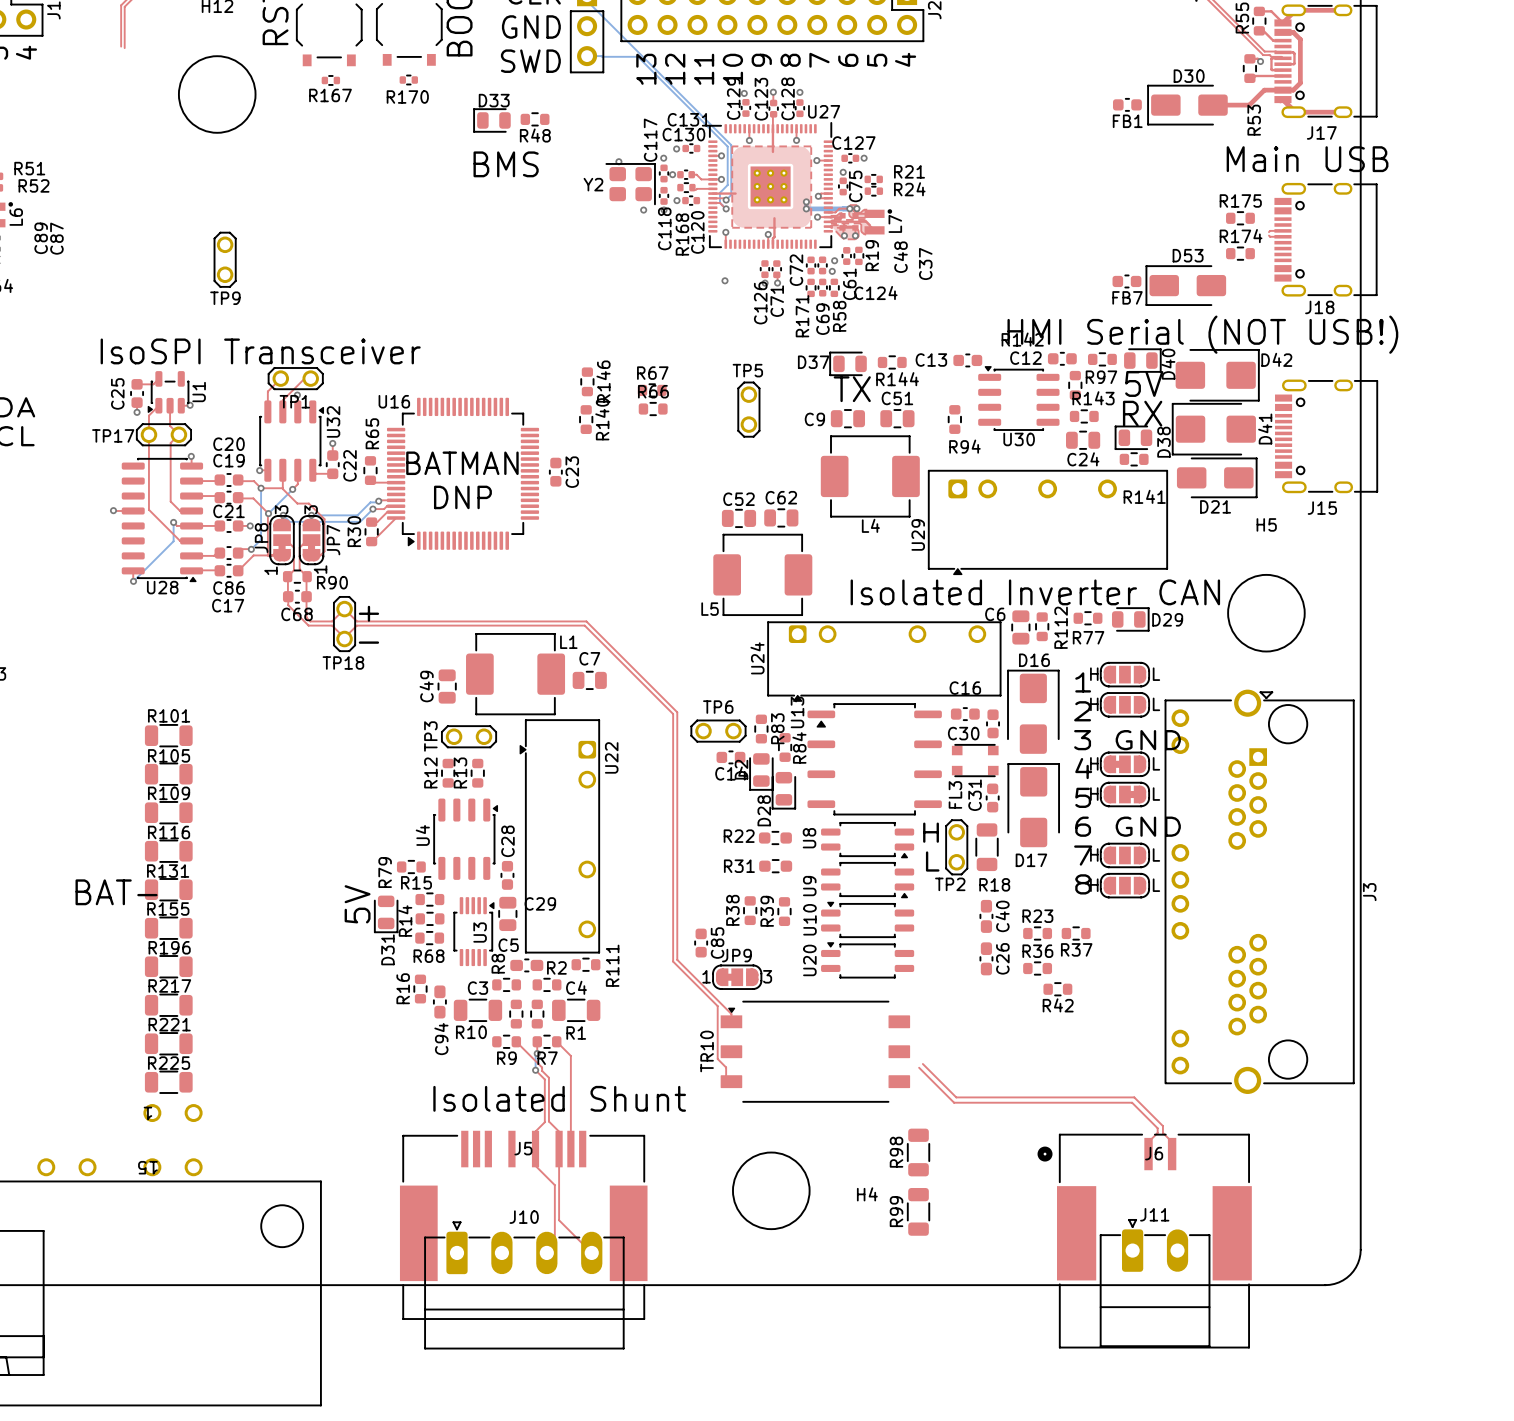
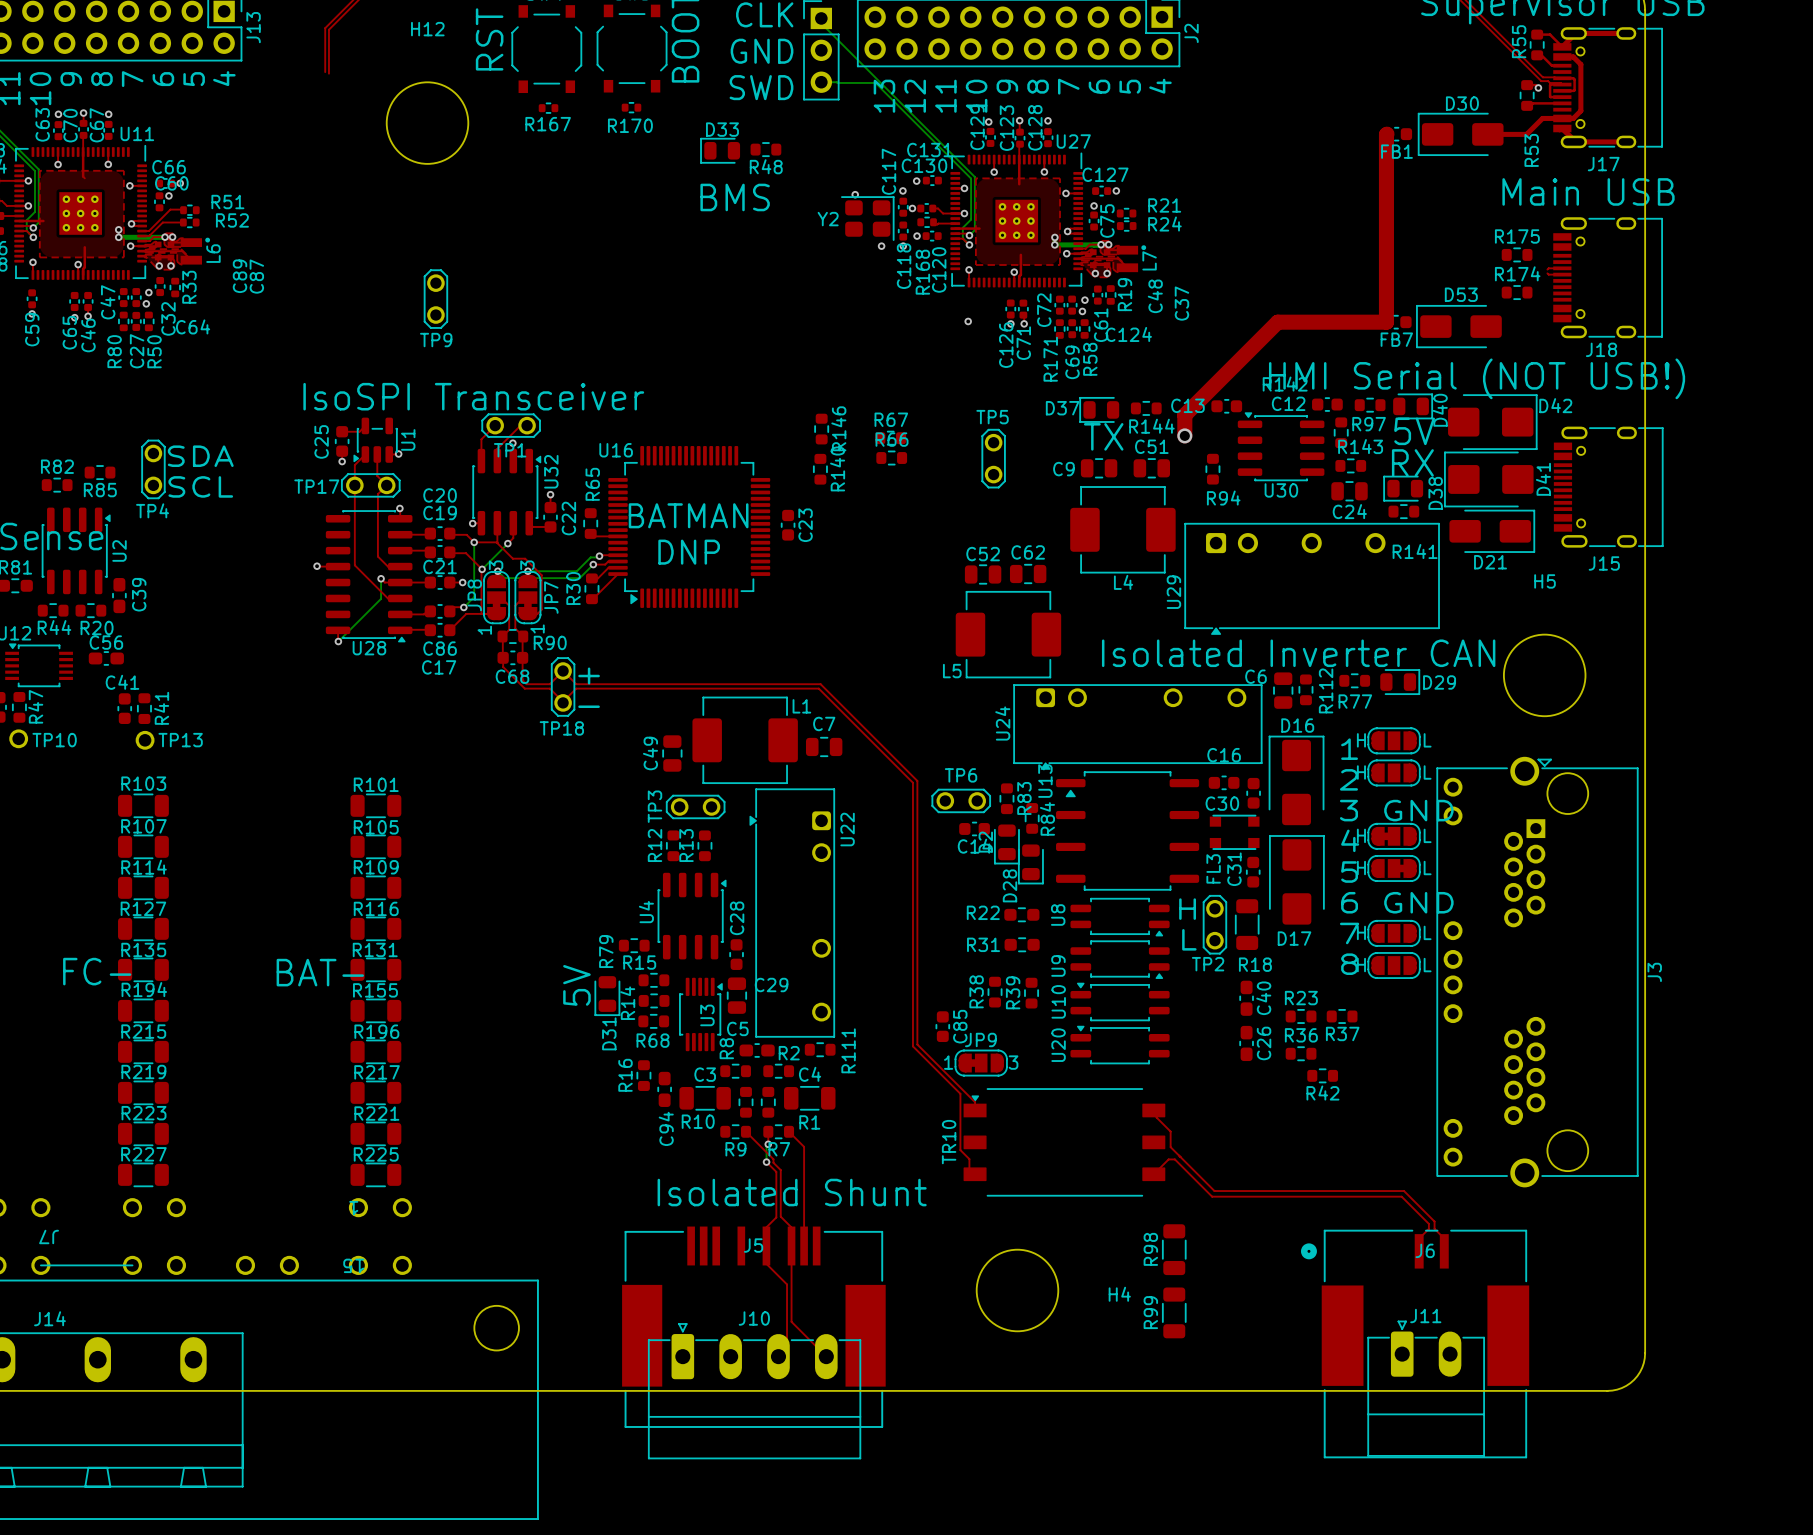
top track: none -> (1386, 134) (1386, 322) (1277, 322) (1184, 415) (1184, 435)
via: none -> (1184, 435)
top track: none -> (1153, 1110) (1156, 1113) (1156, 1117) (1170, 1131) (1170, 1147) (1178, 1155)
top track: none -> (1174, 1159) (1168, 1159) (1153, 1174)

